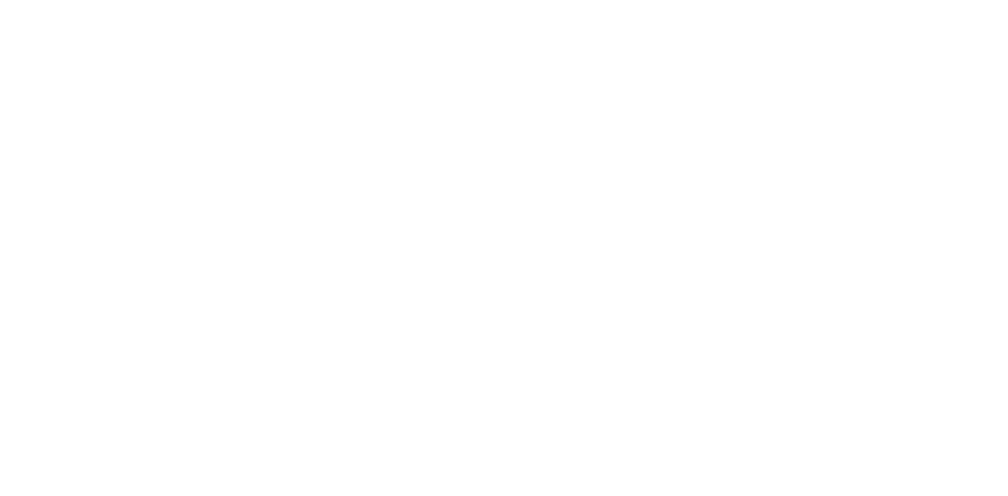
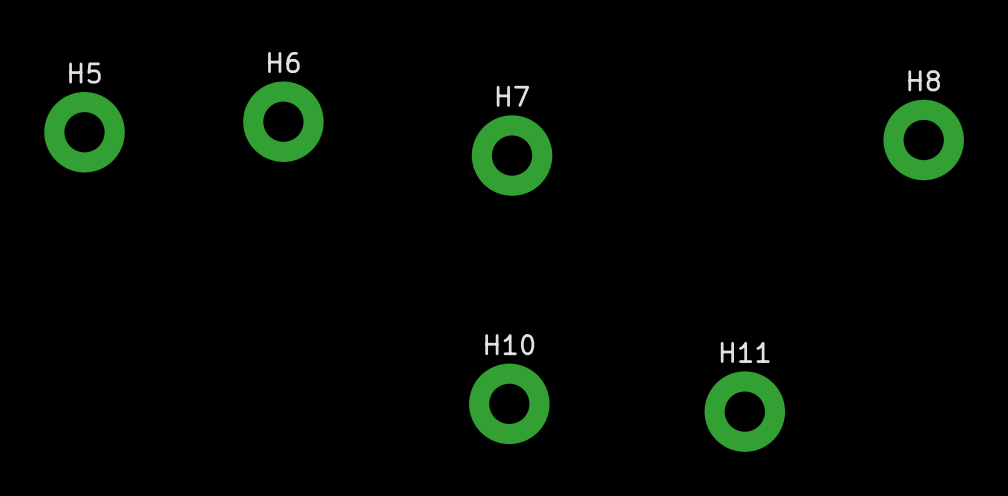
H6: none -> (283, 121)
H5: none -> (84, 132)
H8: none -> (923, 140)
H7: none -> (512, 155)
H10: none -> (509, 403)
H11: none -> (744, 411)

